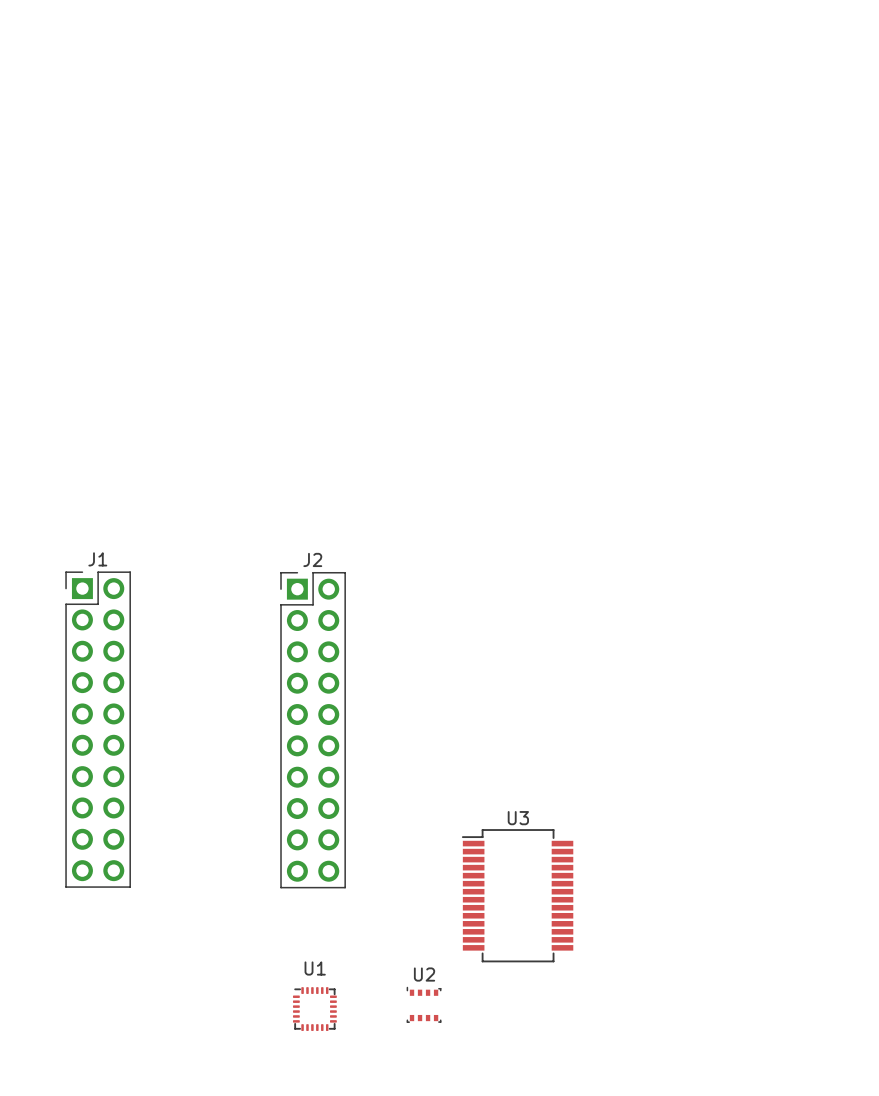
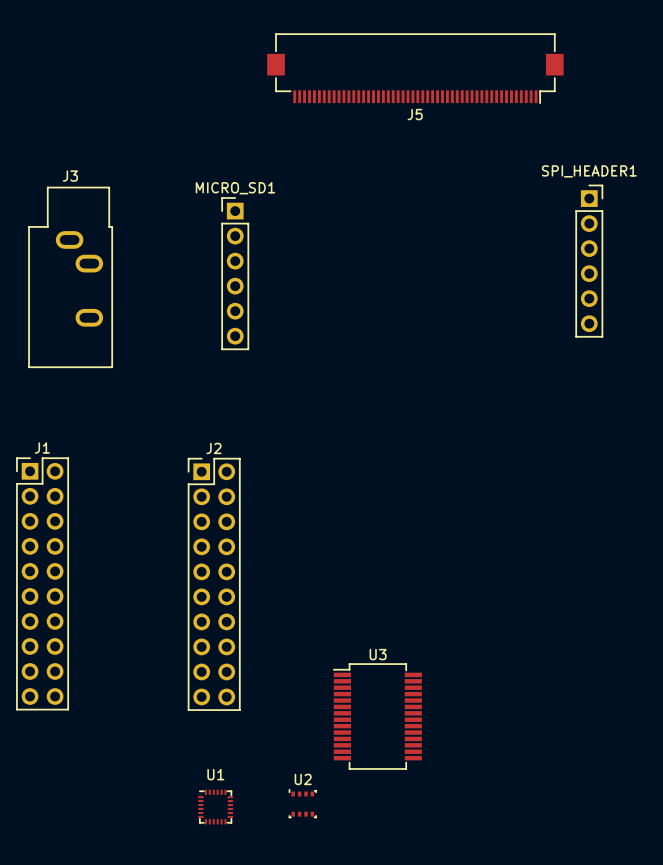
J5: none -> (415, 68)
SPI_HEADER1: none -> (589, 261)
MICRO_SD1: none -> (235, 273)
J3: none -> (70, 277)

